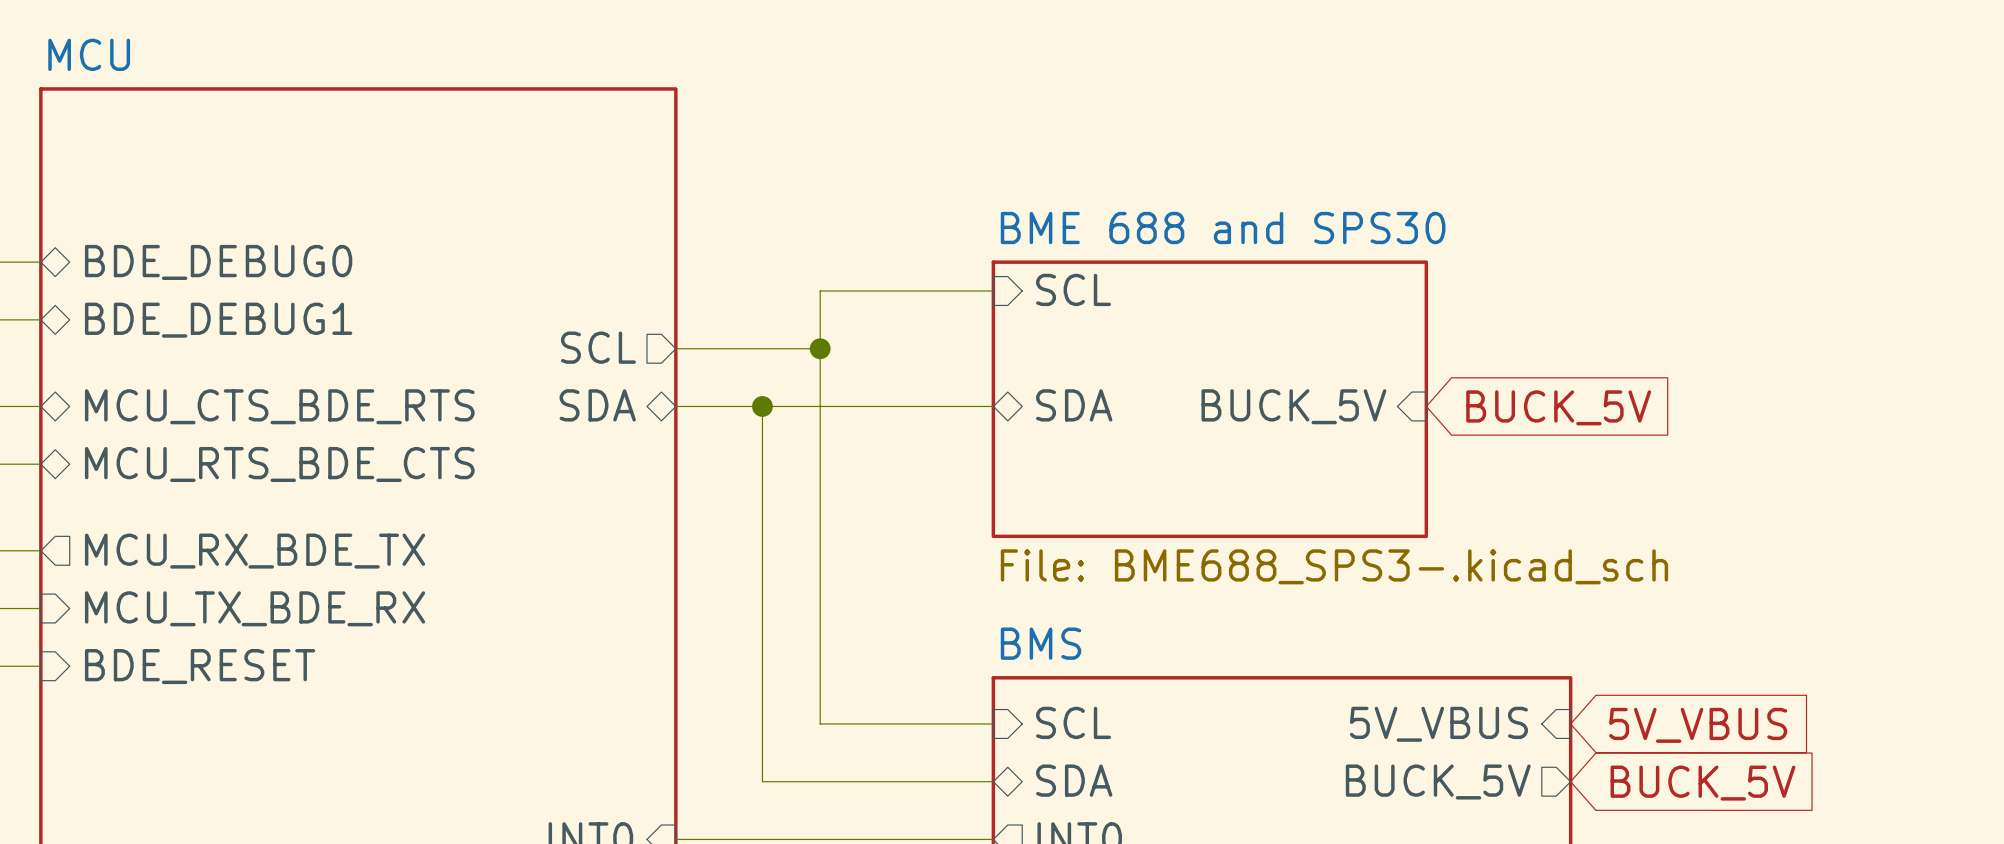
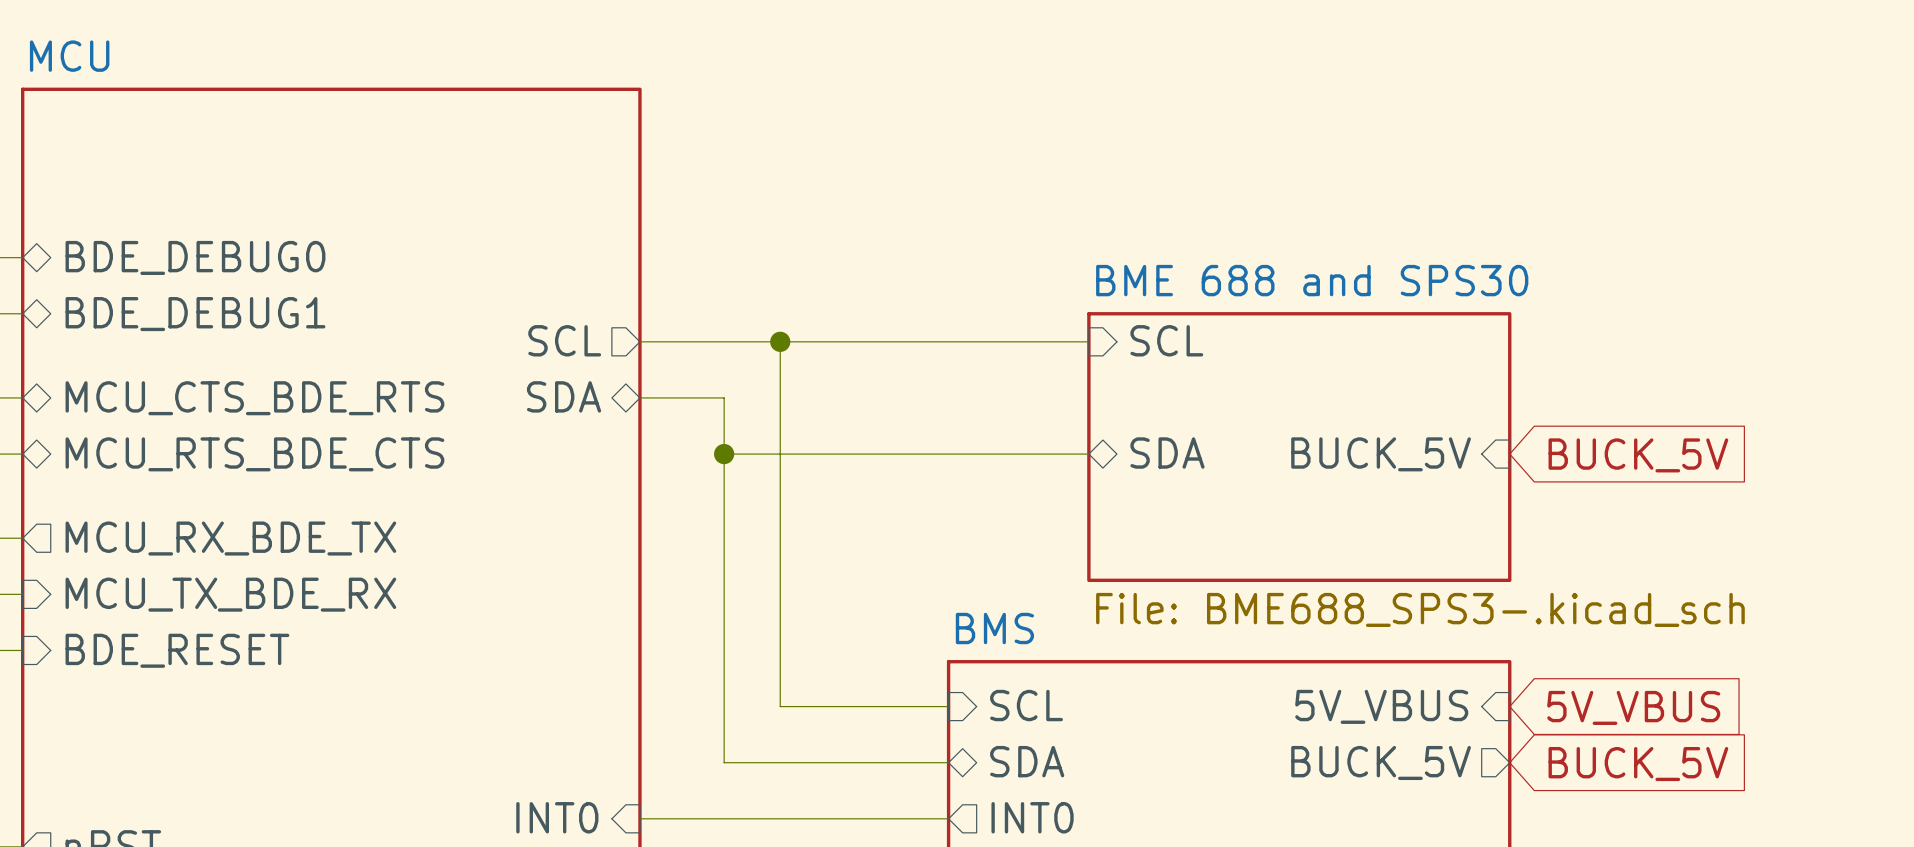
sheet pin position: SCL (1073, 289) -> SCL (1166, 340)
wire: (993, 291) (820, 291) (820, 348) -> (1088, 341) (780, 341)
sheet BME 688 and SPS30 position: (1209, 399) -> (1299, 447)
sheet pin position: SDA (1074, 405) -> SDA (1167, 453)
wire: (762, 406) (993, 406) -> none
junction position: (762, 406) -> (724, 454)
sheet pin position: BUCK_5V (1293, 406) -> BUCK_5V (1381, 454)
global label position: BUCK_5V (1558, 407) -> BUCK_5V (1638, 455)
wire: none -> (724, 454) (1088, 454)

